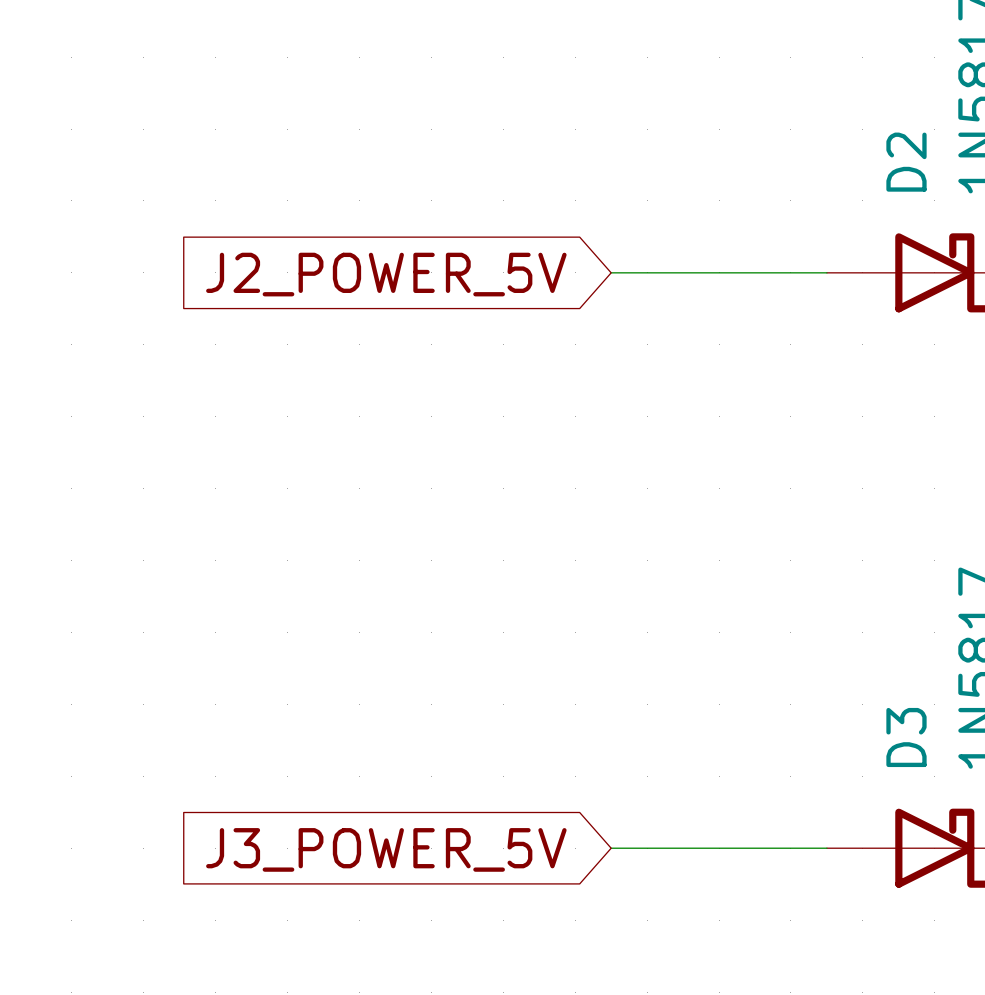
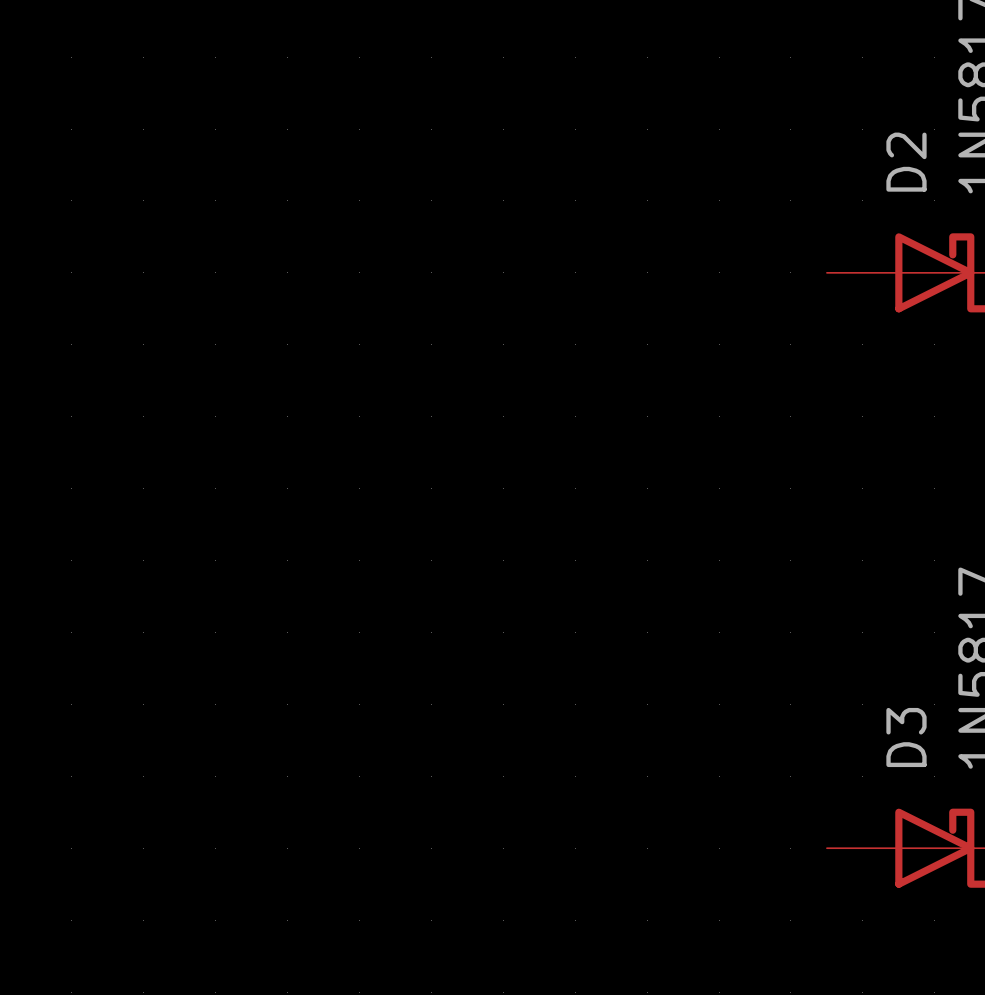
wire: (611, 272) (826, 272) -> none
global label: J2_POWER_5V (386, 274) -> none
wire: (611, 848) (826, 848) -> none
global label: J3_POWER_5V (386, 849) -> none

